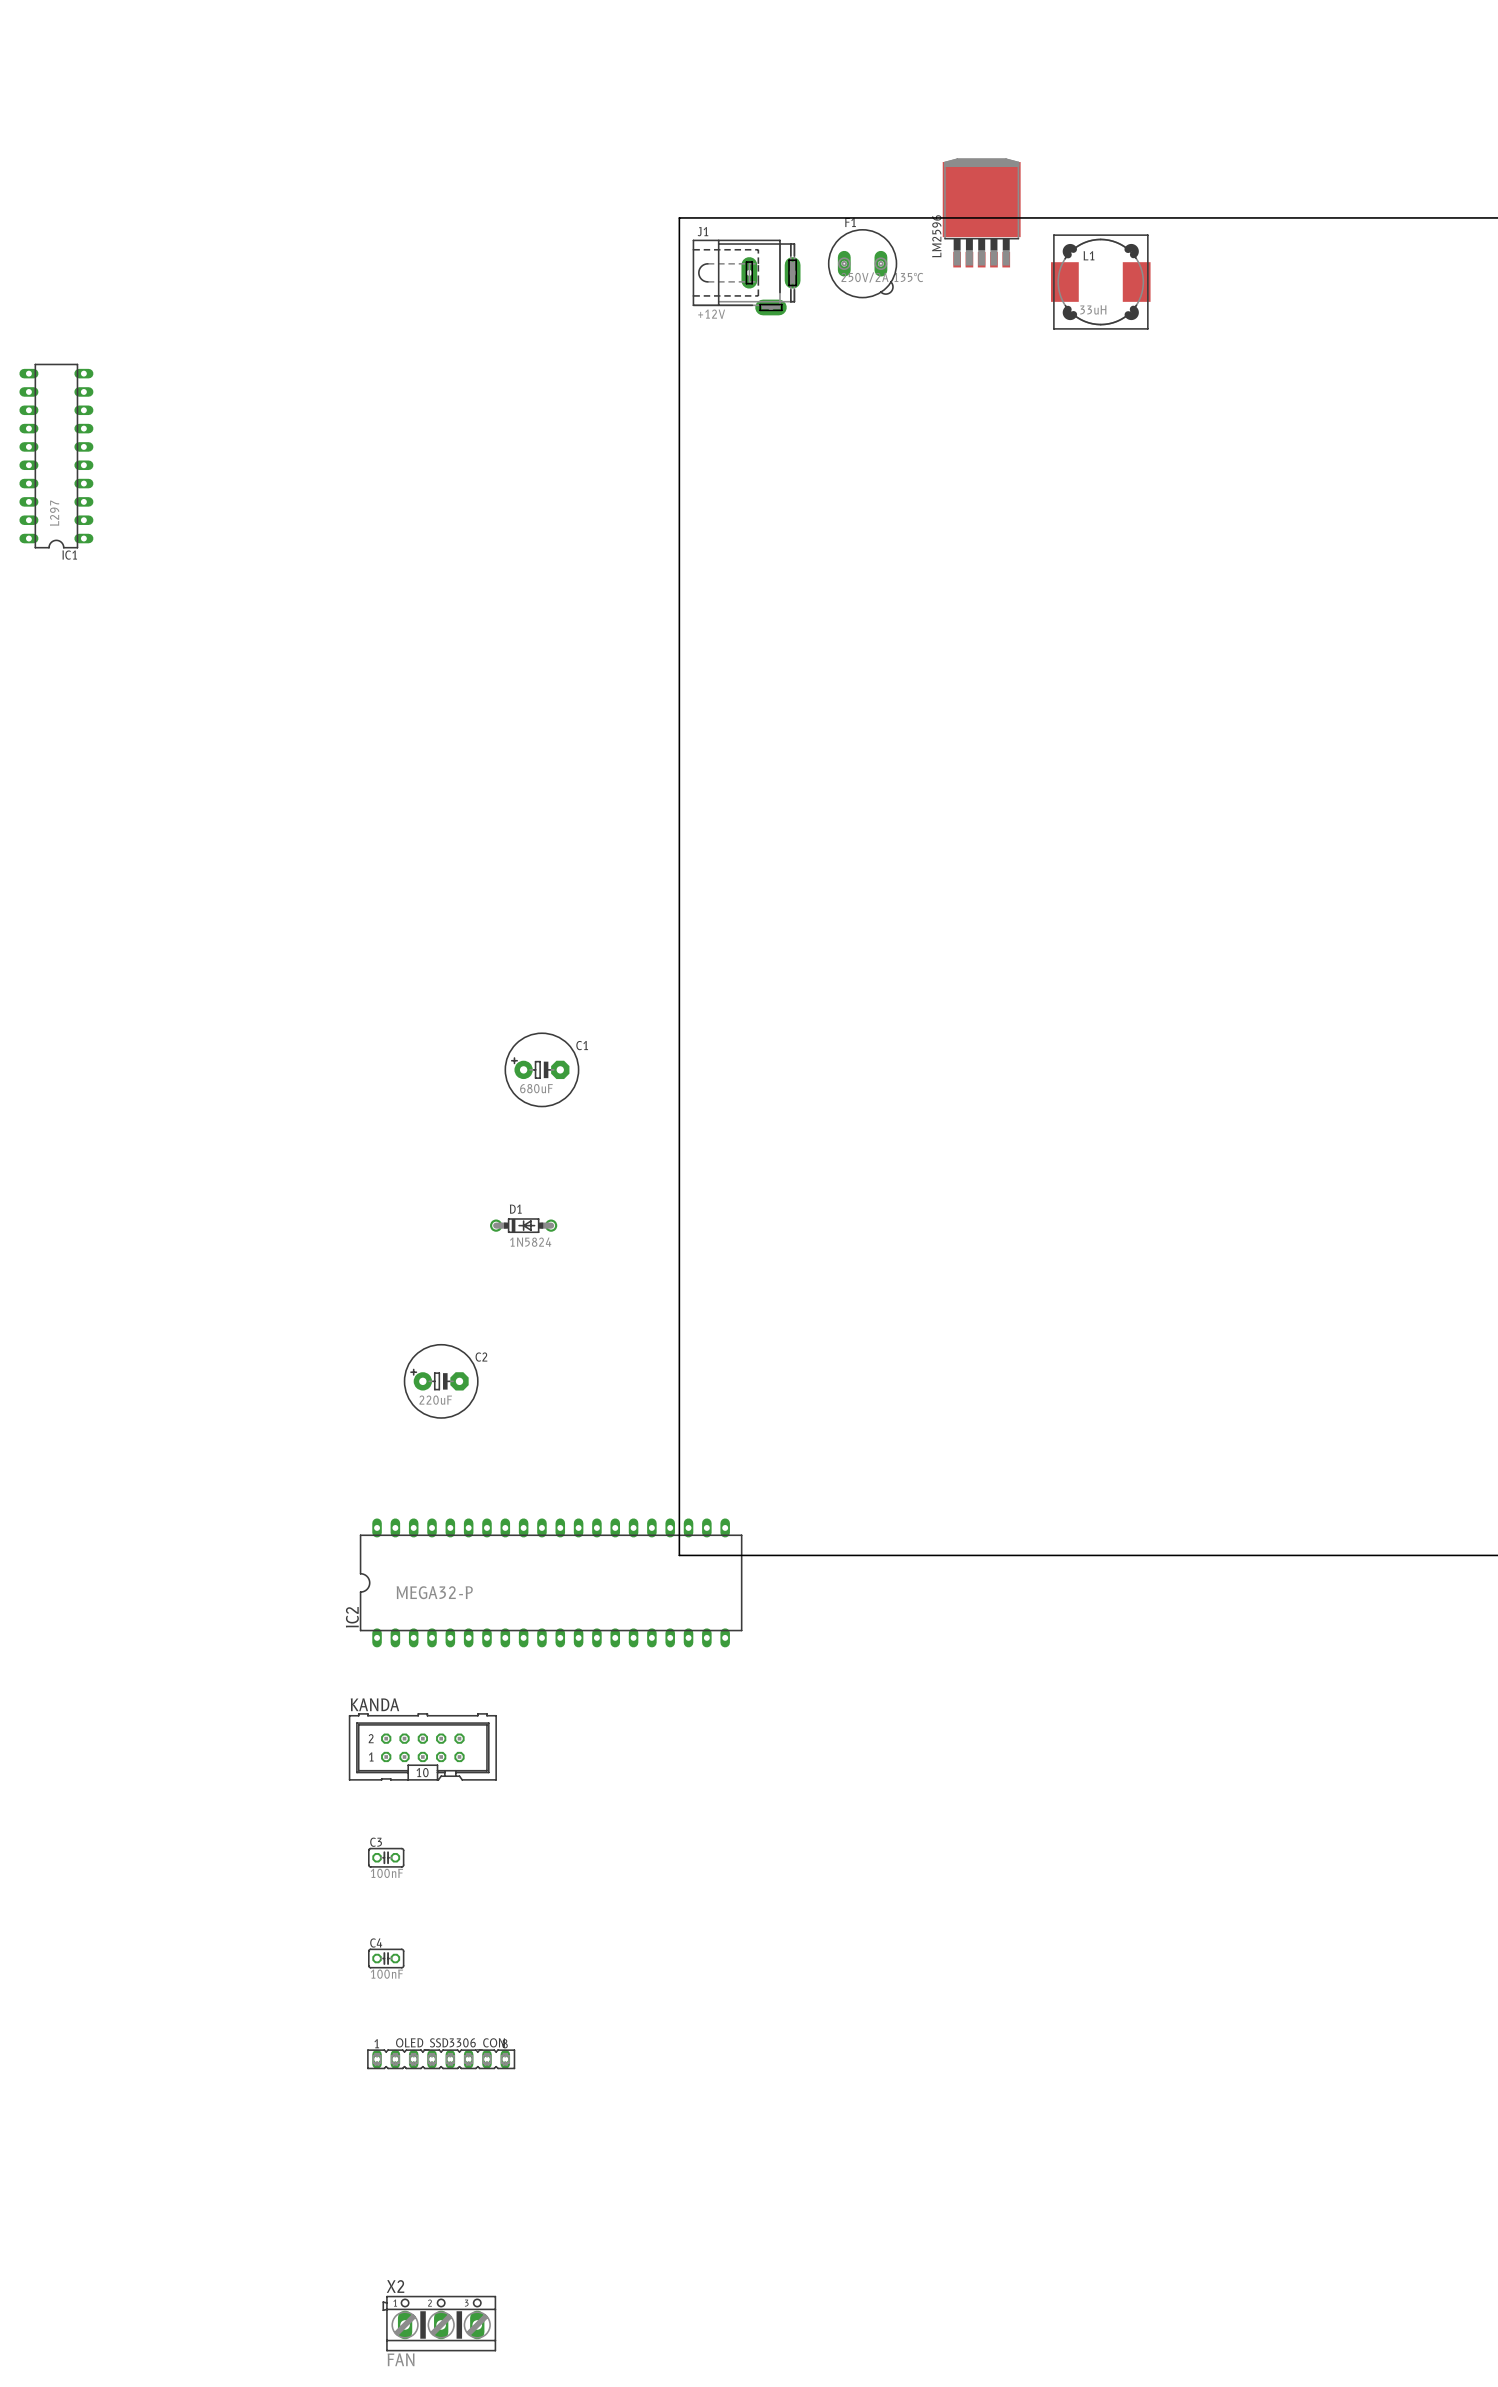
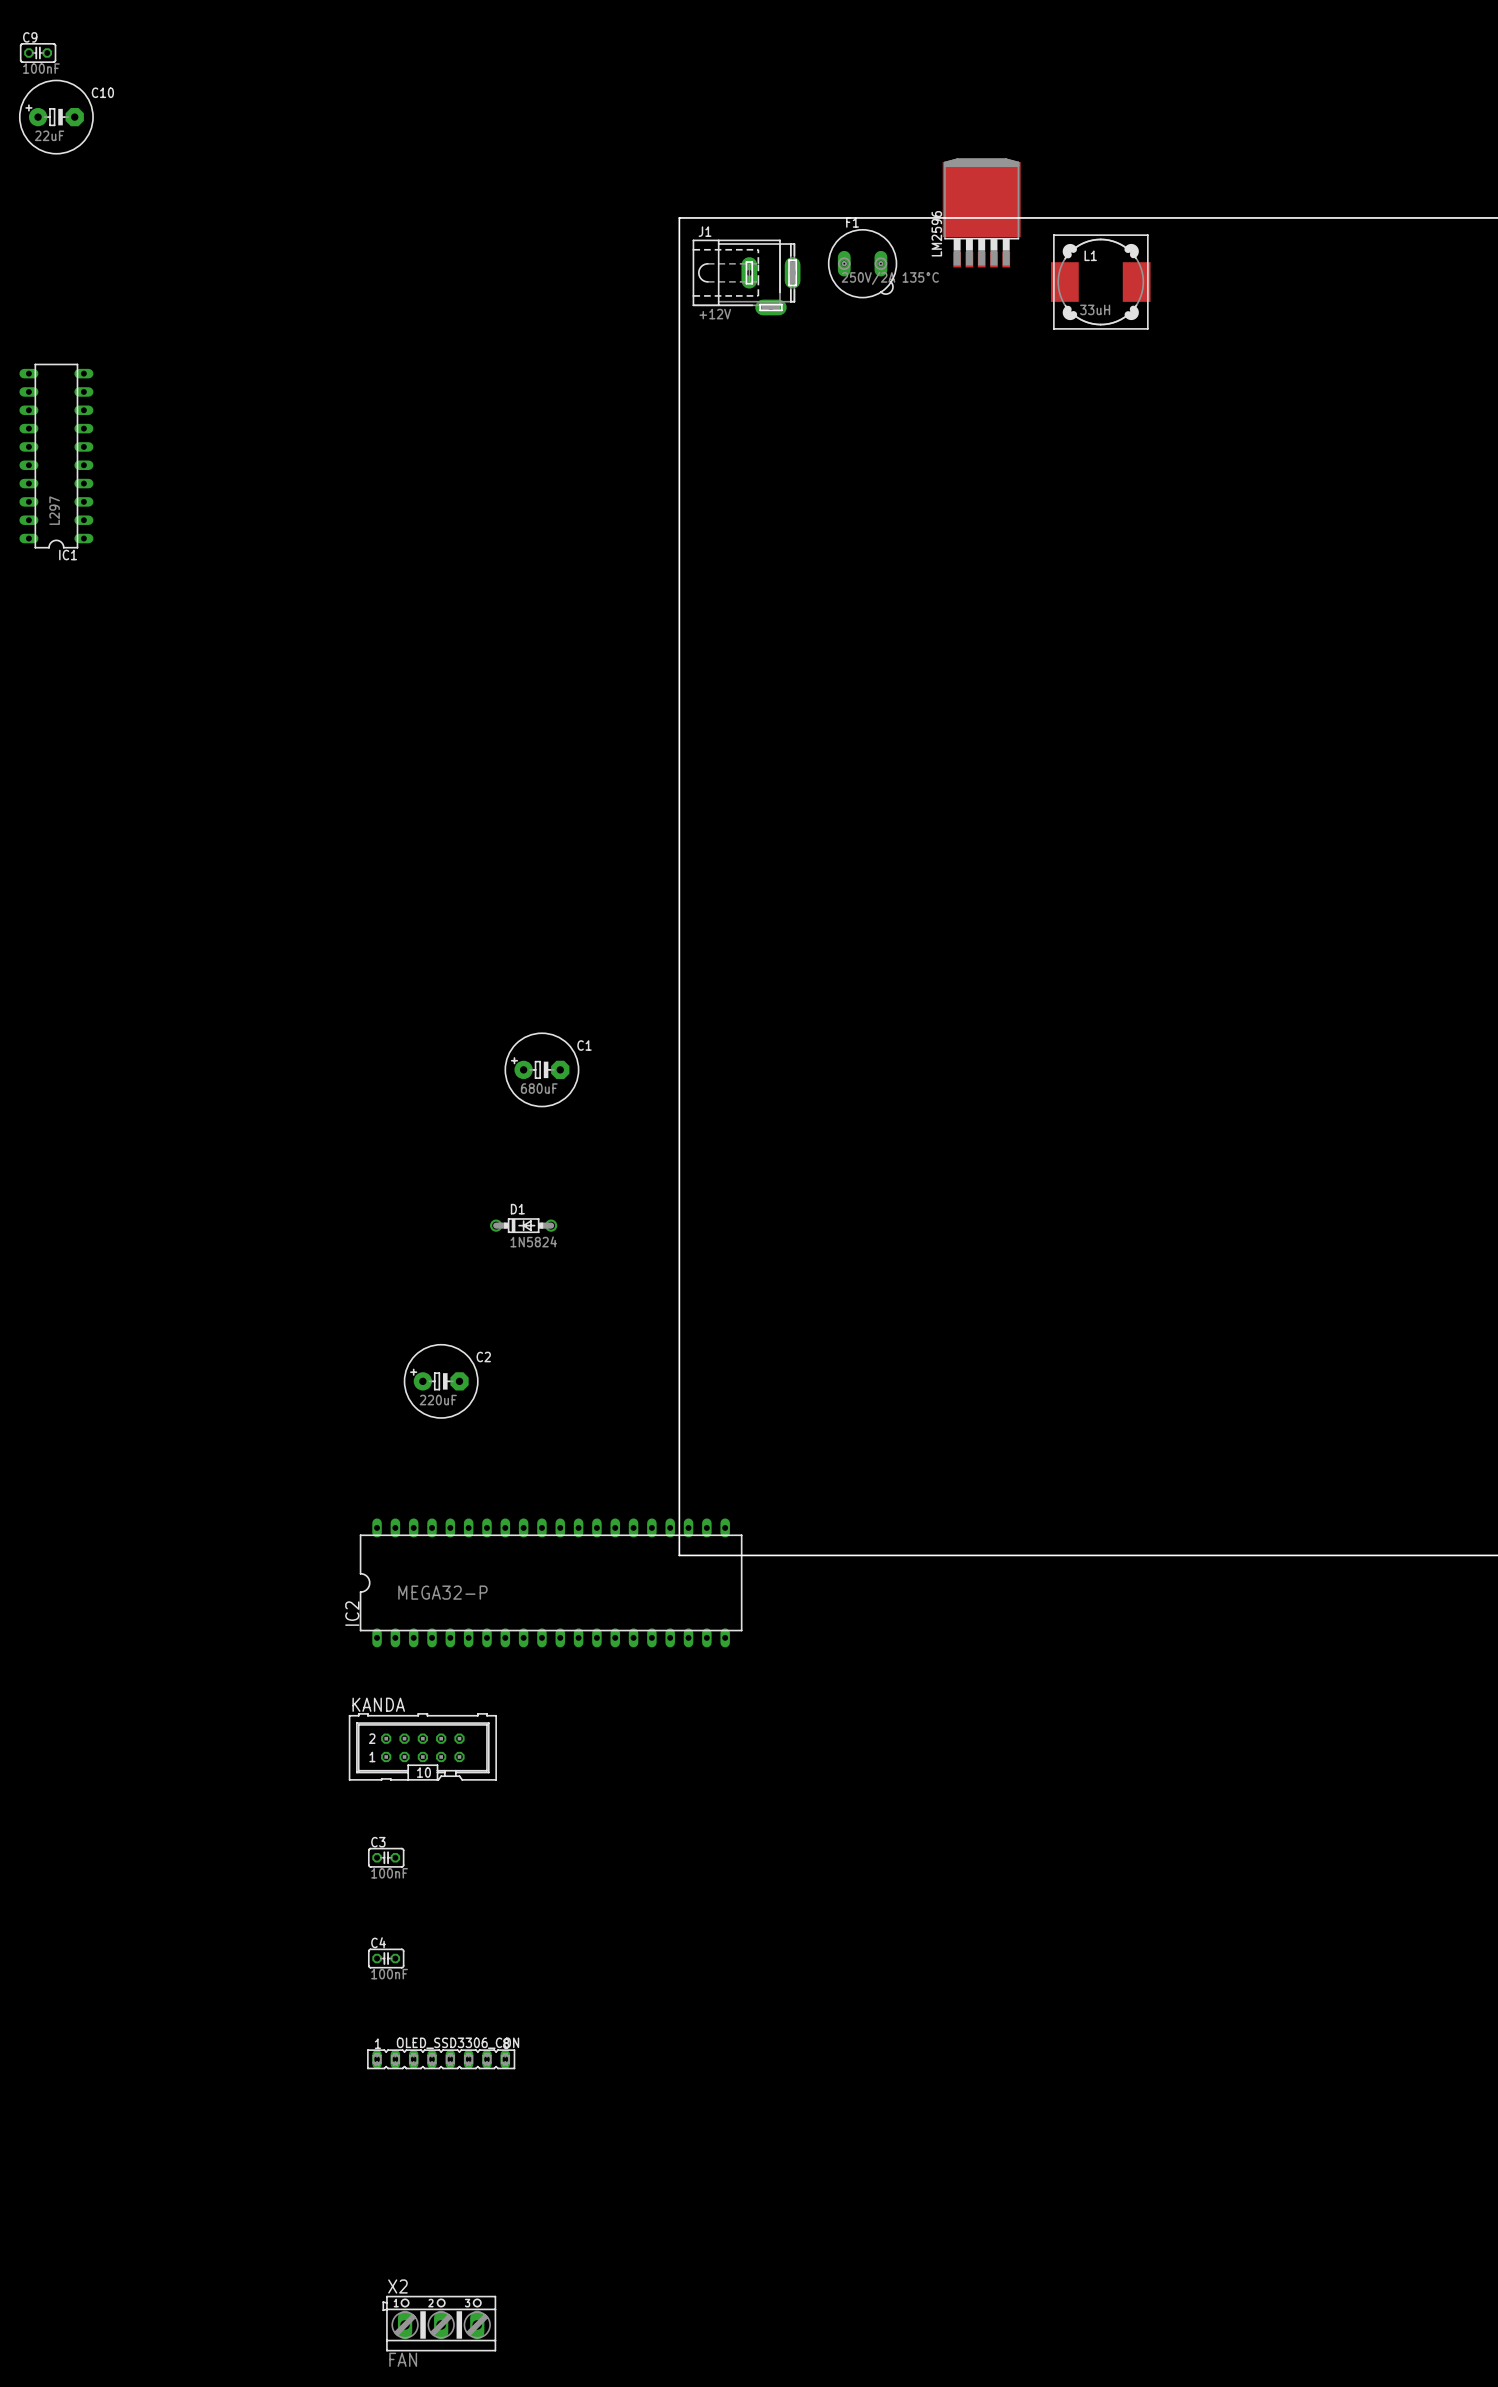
C9: none -> 100nF (38, 52)
C10: none -> 22uF (56, 117)

